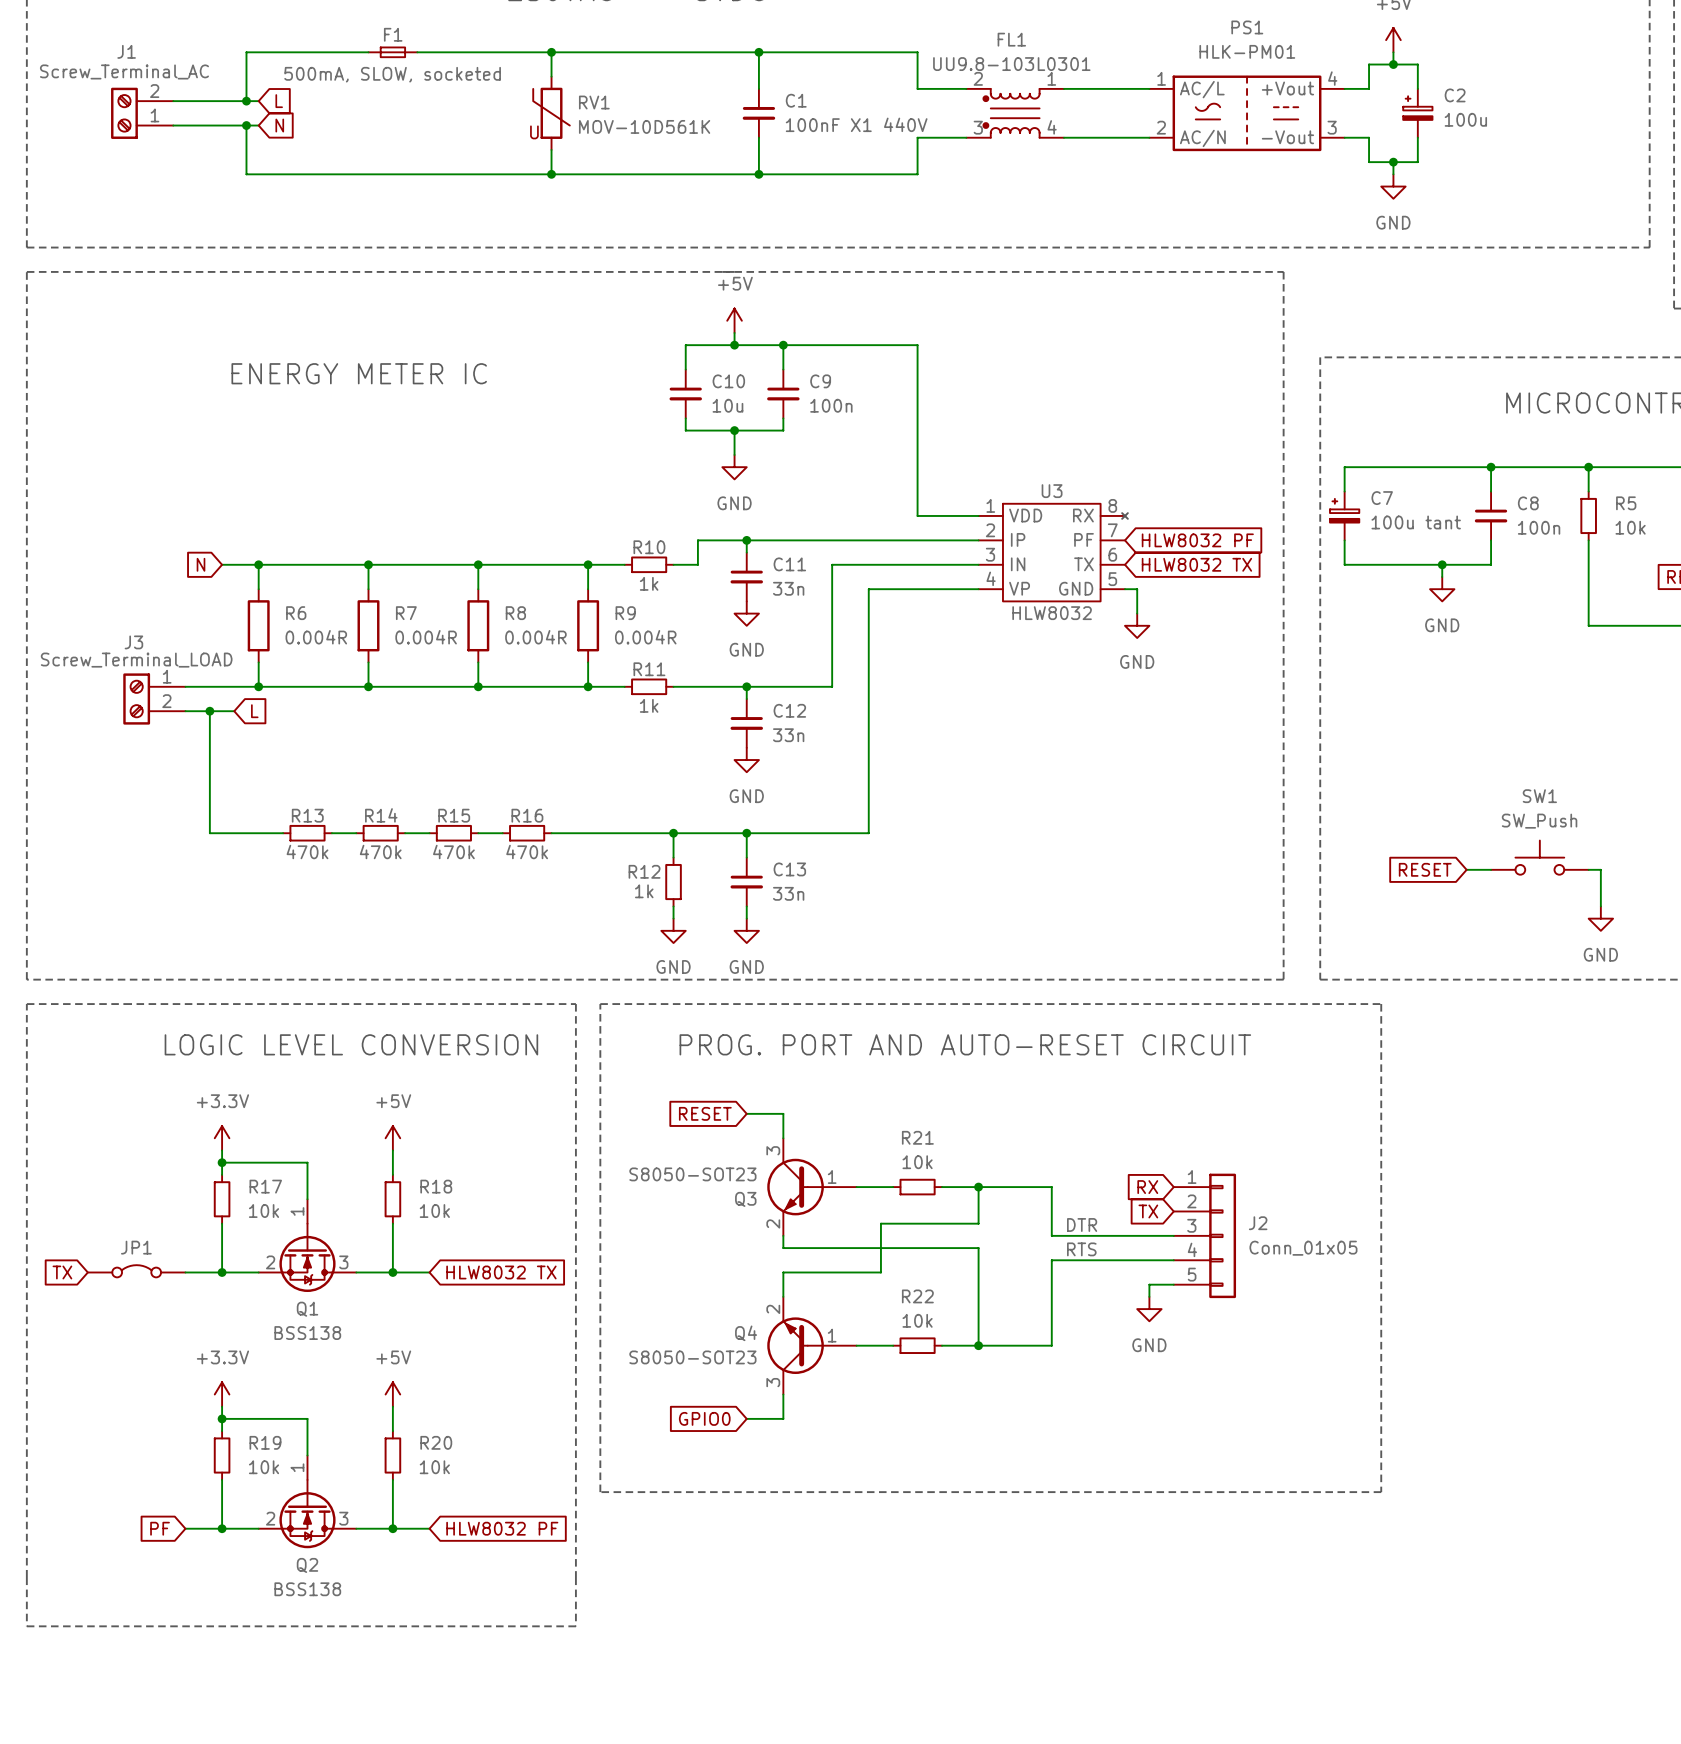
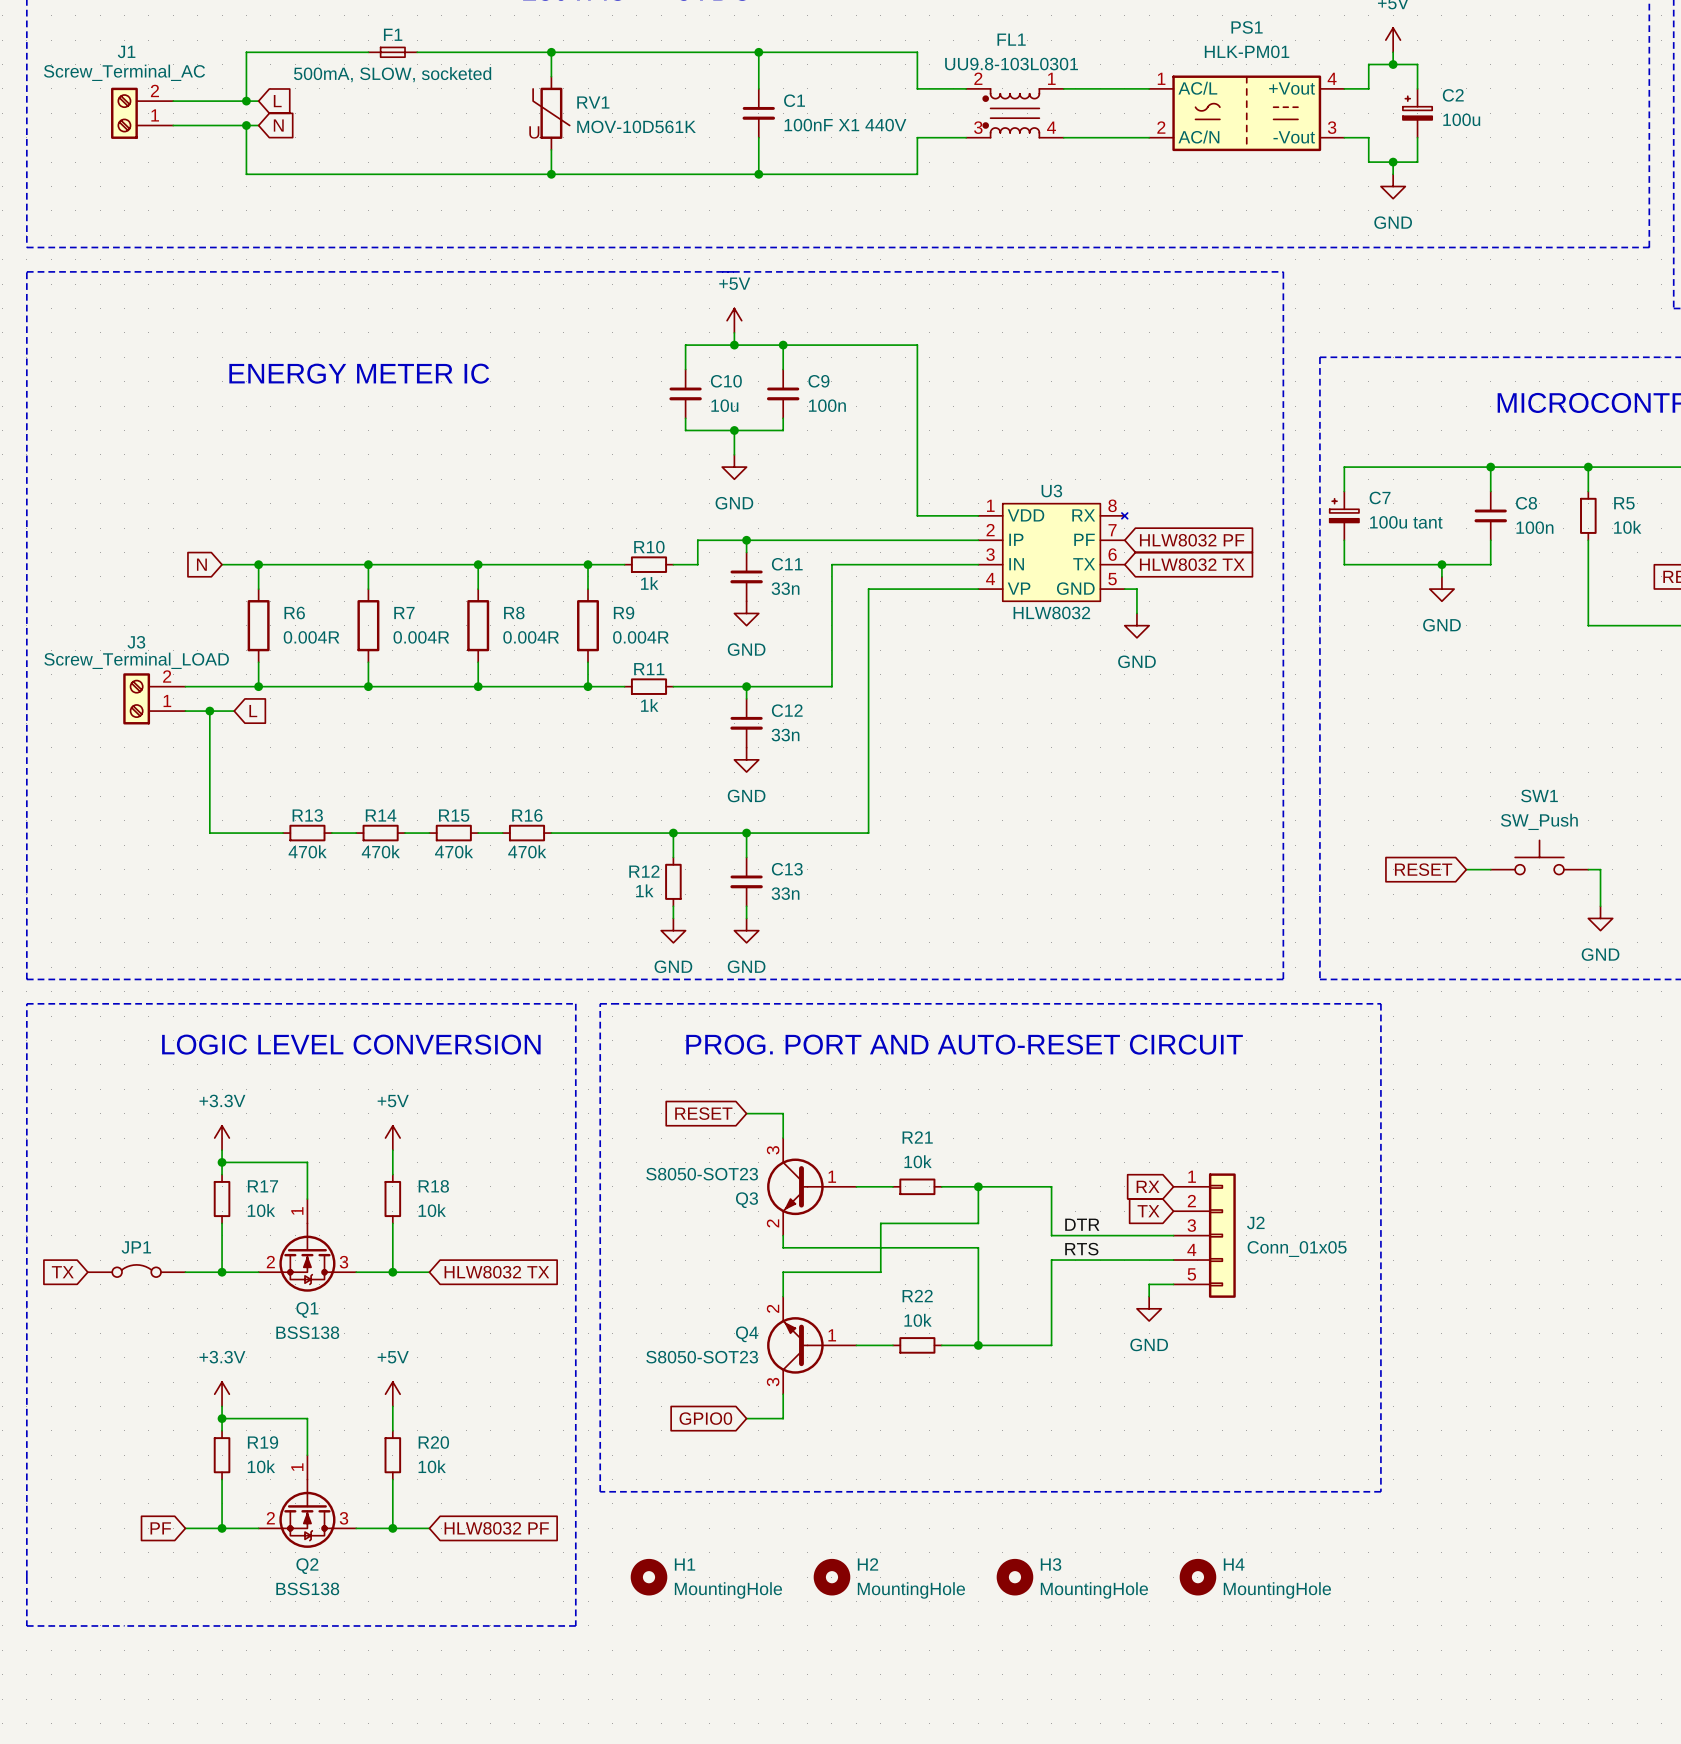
J3 flip: as is (136, 699) -> up-down (136, 698)
H1: none -> MountingHole (649, 1577)
H2: none -> MountingHole (831, 1577)
H3: none -> MountingHole (1014, 1577)
H4: none -> MountingHole (1197, 1577)

